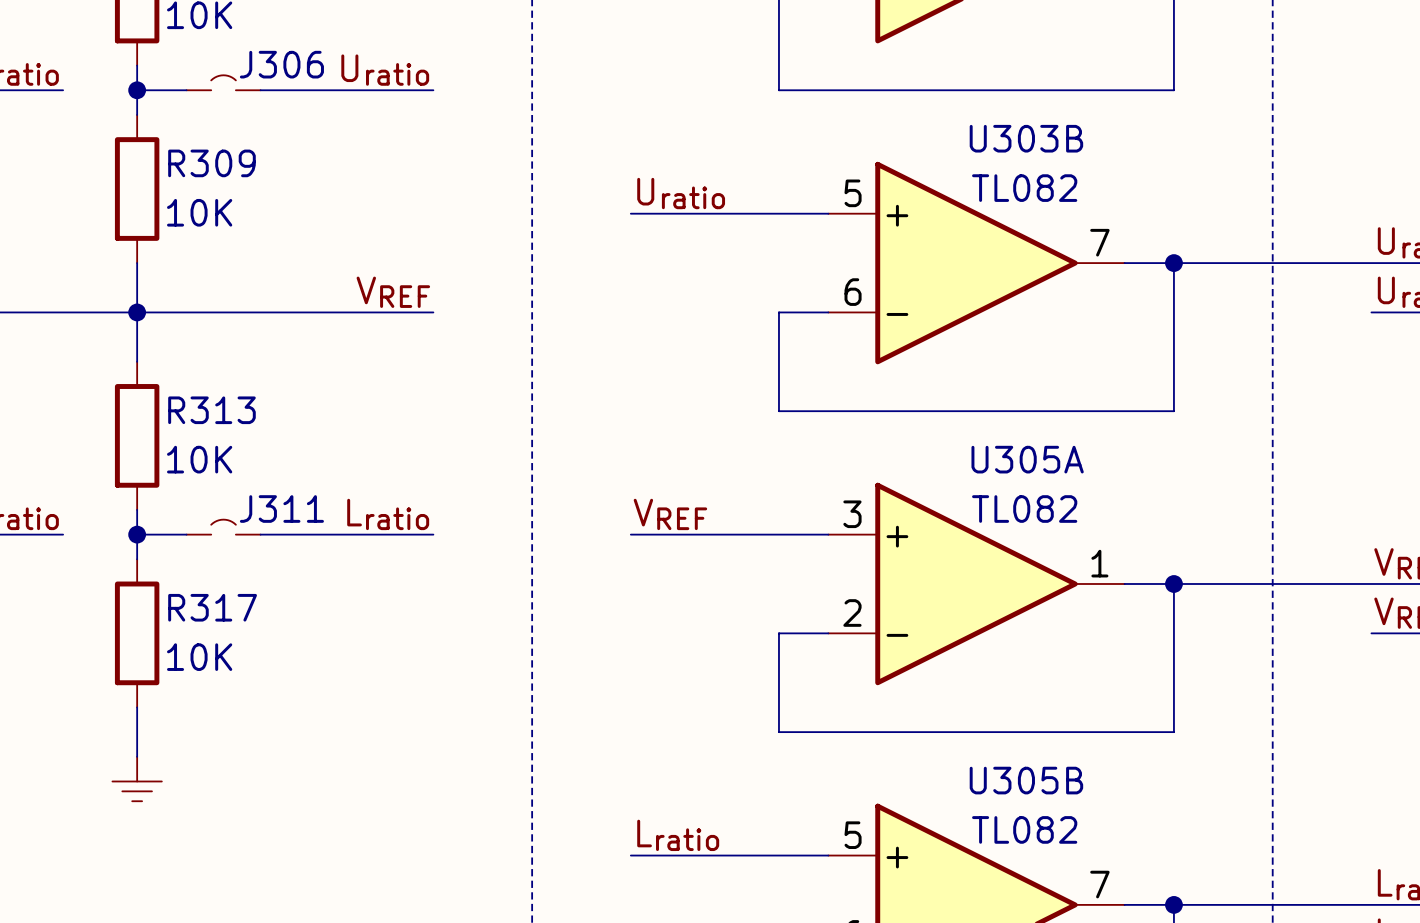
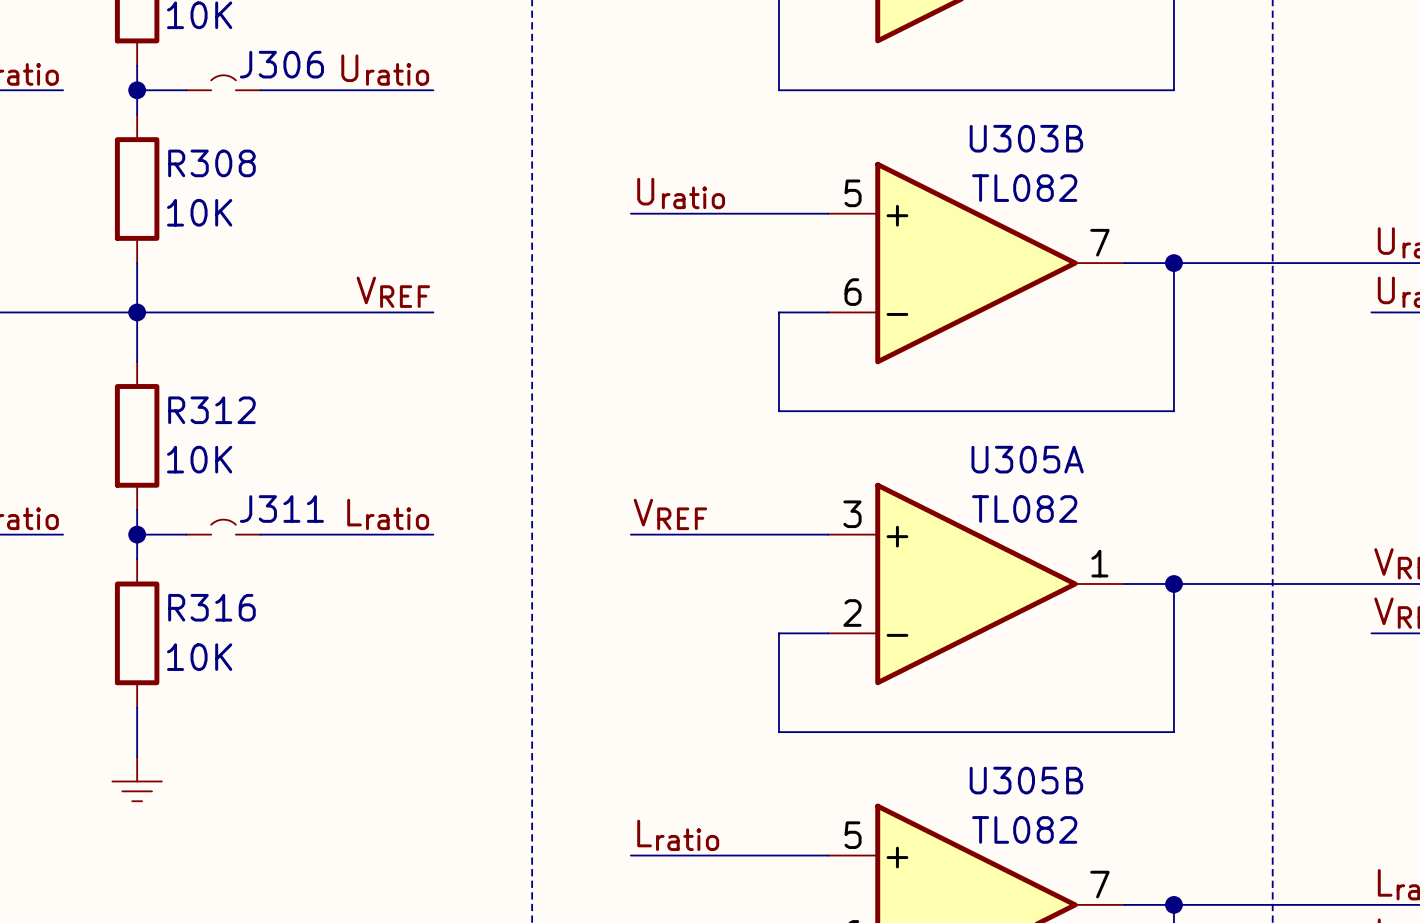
R309 name: R309 (211, 163) -> R308 (211, 163)
R313 name: R313 (211, 410) -> R312 (211, 410)
R317 name: R317 (212, 607) -> R316 (211, 607)

